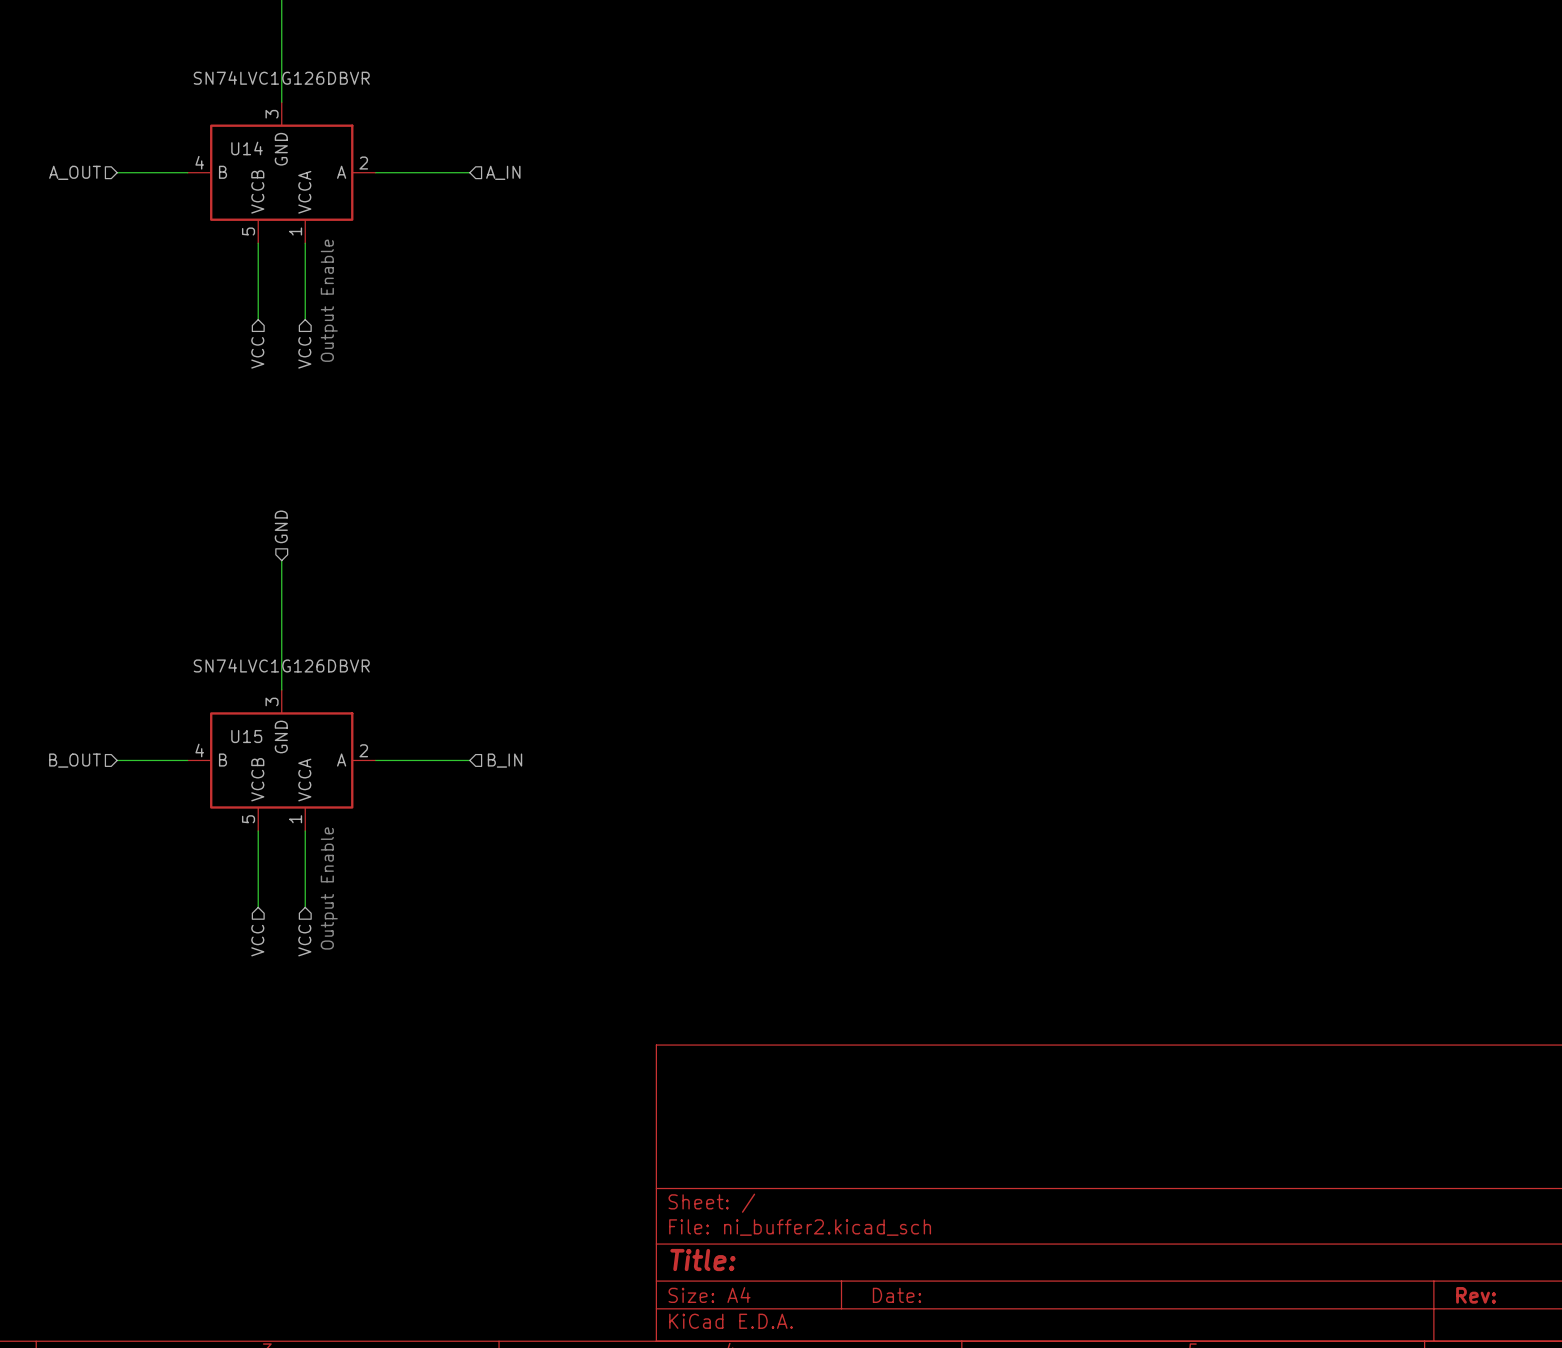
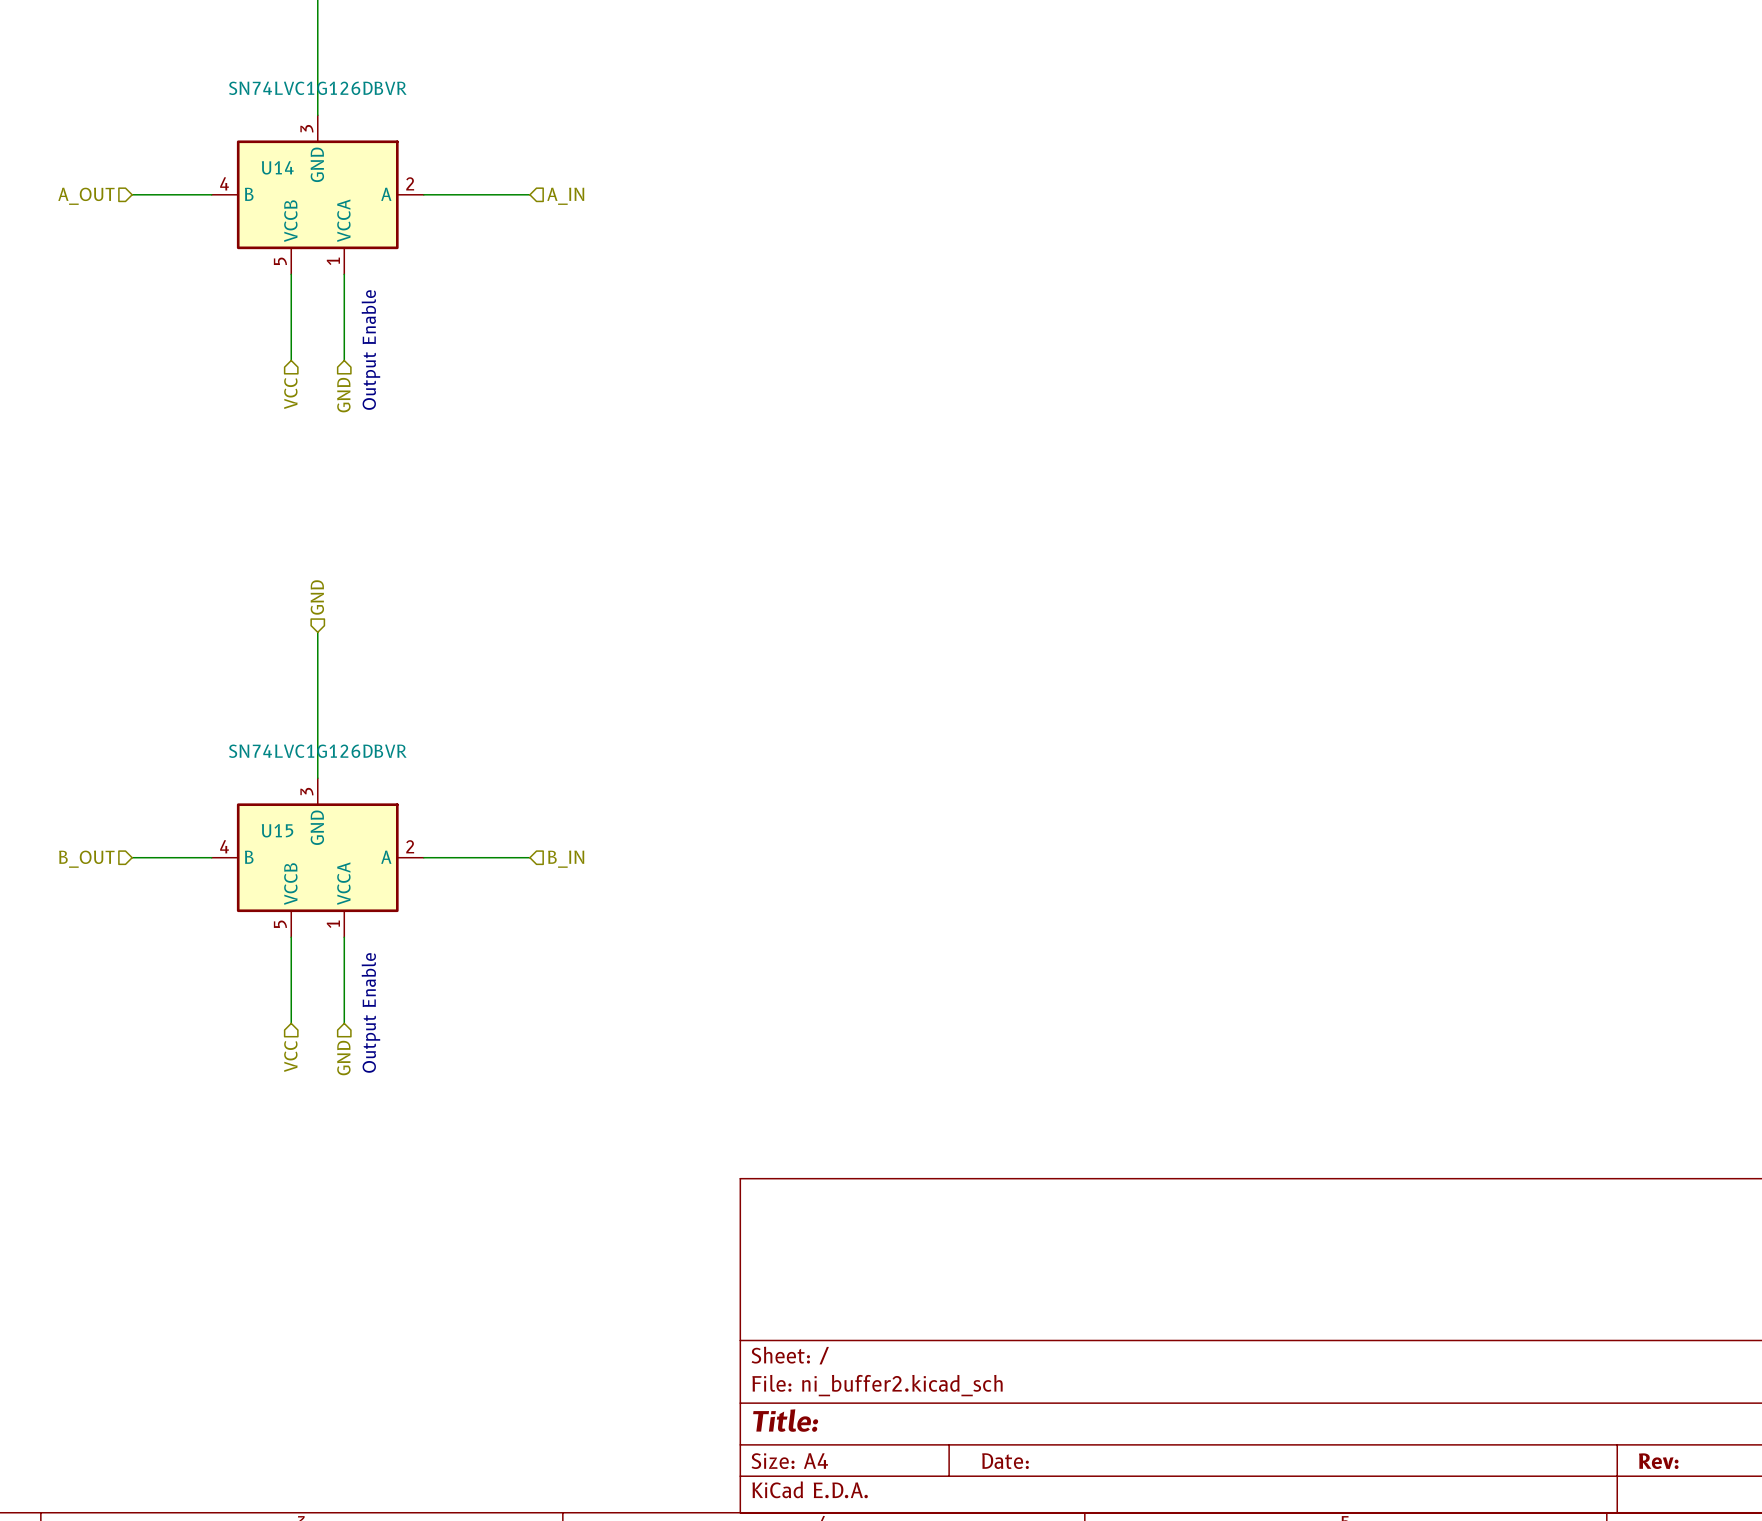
hierarchical label: VCC (304, 352) -> GND (343, 395)
hierarchical label: VCC (304, 940) -> GND (343, 1058)

